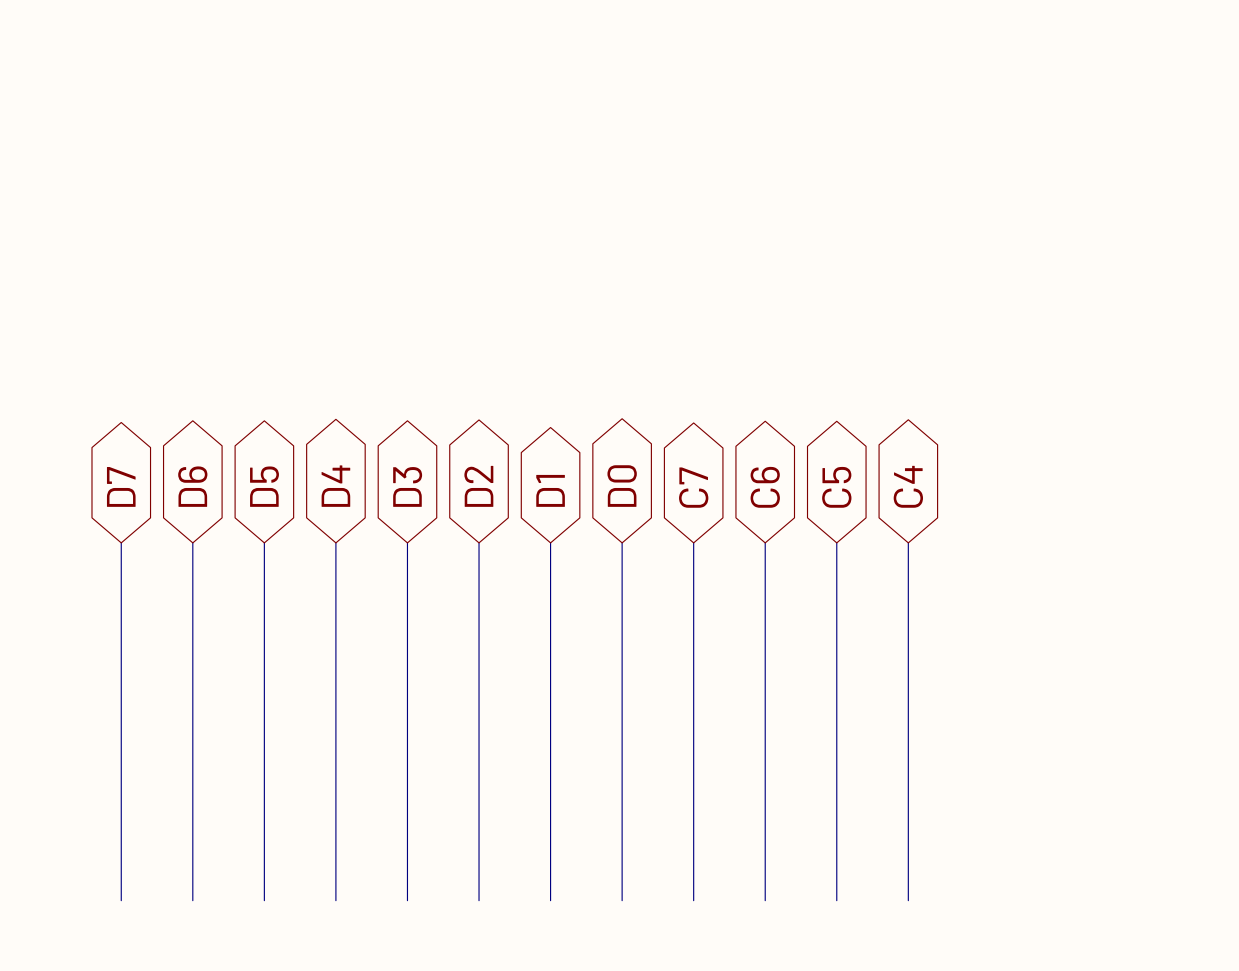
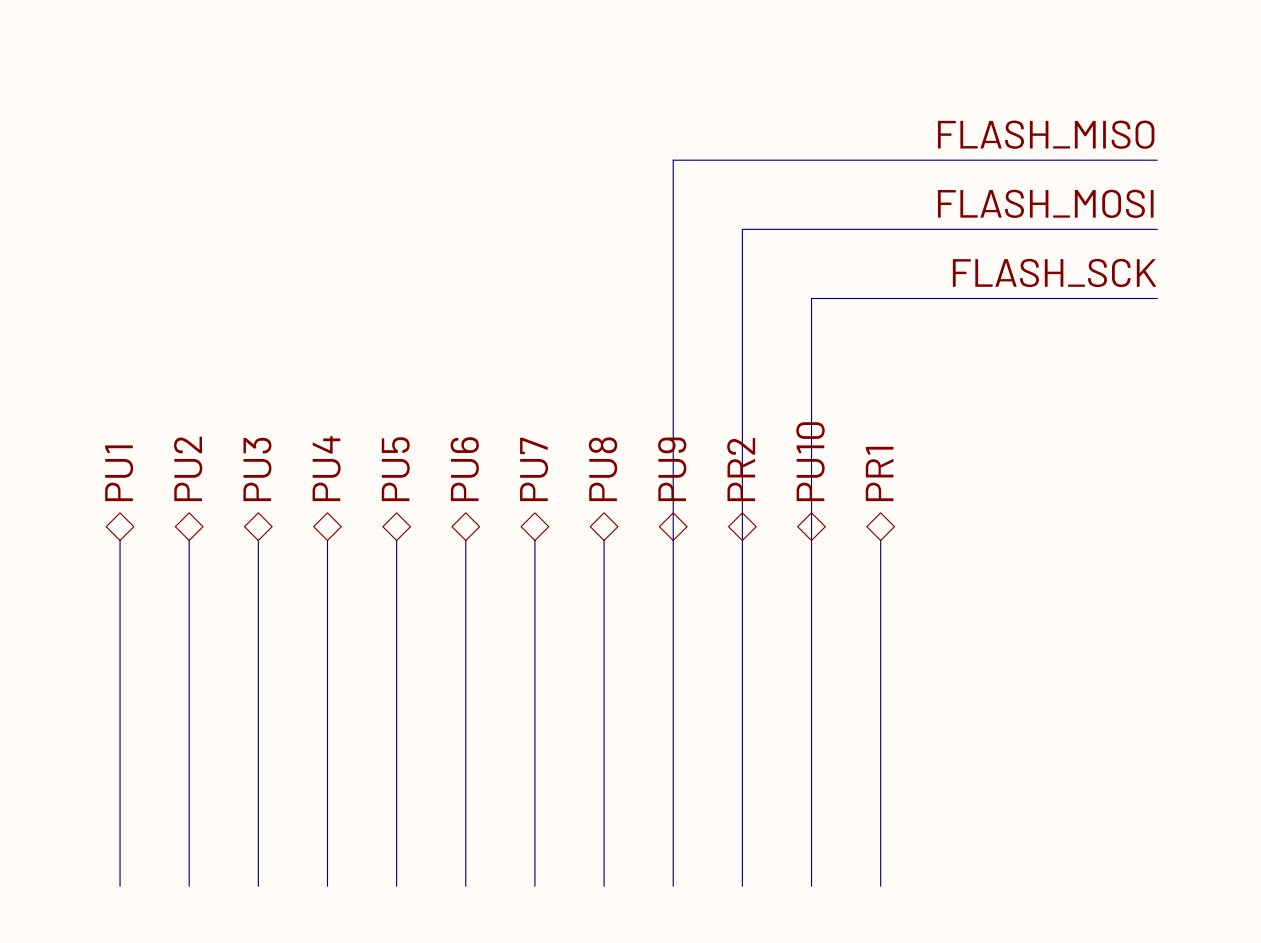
label: none -> FLASH_MISO (1046, 134)
wire: none -> (1157, 160) (673, 160) (673, 540)
label: none -> FLASH_MOSI (1045, 203)
wire: none -> (1157, 229) (742, 229) (742, 540)
label: none -> FLASH_SCK (1054, 273)
wire: none -> (1157, 298) (811, 298) (811, 540)
hierarchical label: none -> PU10 (810, 461)
hierarchical label: none -> PU2 (188, 468)
hierarchical label: none -> PU4 (326, 468)
hierarchical label: none -> PU3 (257, 469)
hierarchical label: none -> PU5 (395, 469)
hierarchical label: none -> PU6 (464, 469)
hierarchical label: none -> PU7 (534, 469)
hierarchical label: none -> PU8 (603, 469)
hierarchical label: none -> PU9 (672, 469)
hierarchical label: none -> PR2 (741, 469)
hierarchical label: none -> PU1 (119, 473)
hierarchical label: none -> PR1 (879, 473)
global label: D7 (121, 486) -> none
global label: D6 (192, 486) -> none
global label: D5 (264, 486) -> none
global label: D4 (335, 486) -> none
global label: D3 (407, 486) -> none
global label: D2 (478, 486) -> none
global label: D0 (622, 486) -> none
global label: C4 (908, 486) -> none
global label: C7 (693, 487) -> none
global label: C6 (765, 487) -> none
global label: C5 (836, 487) -> none
global label: D1 (550, 490) -> none

